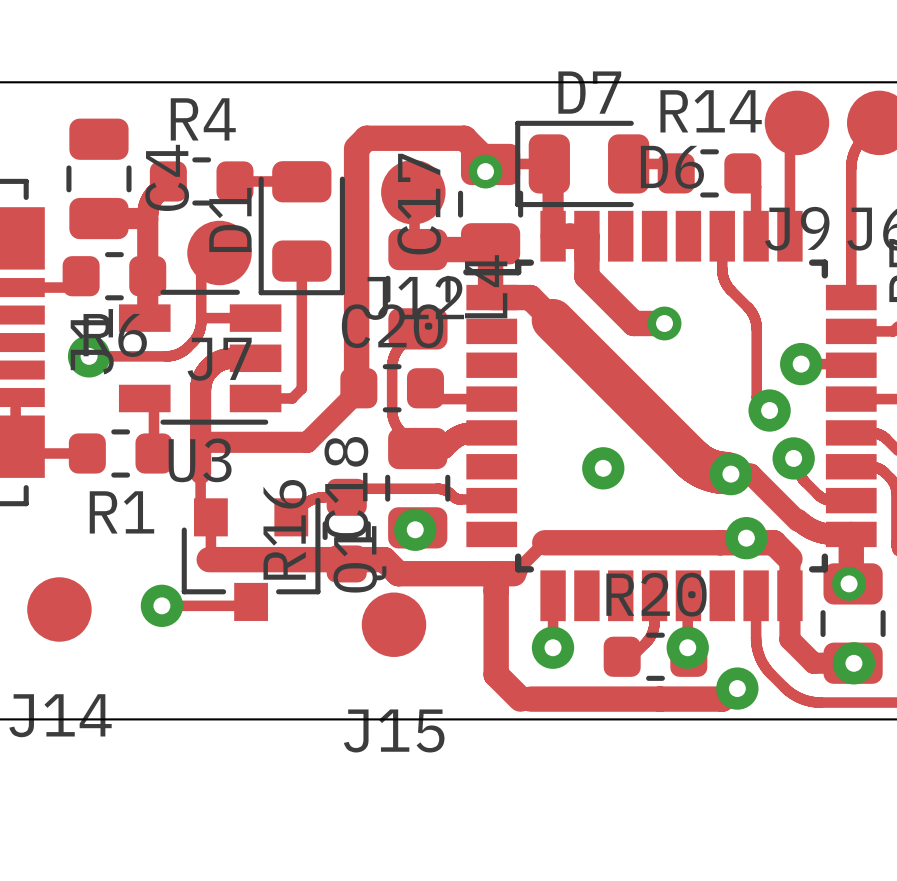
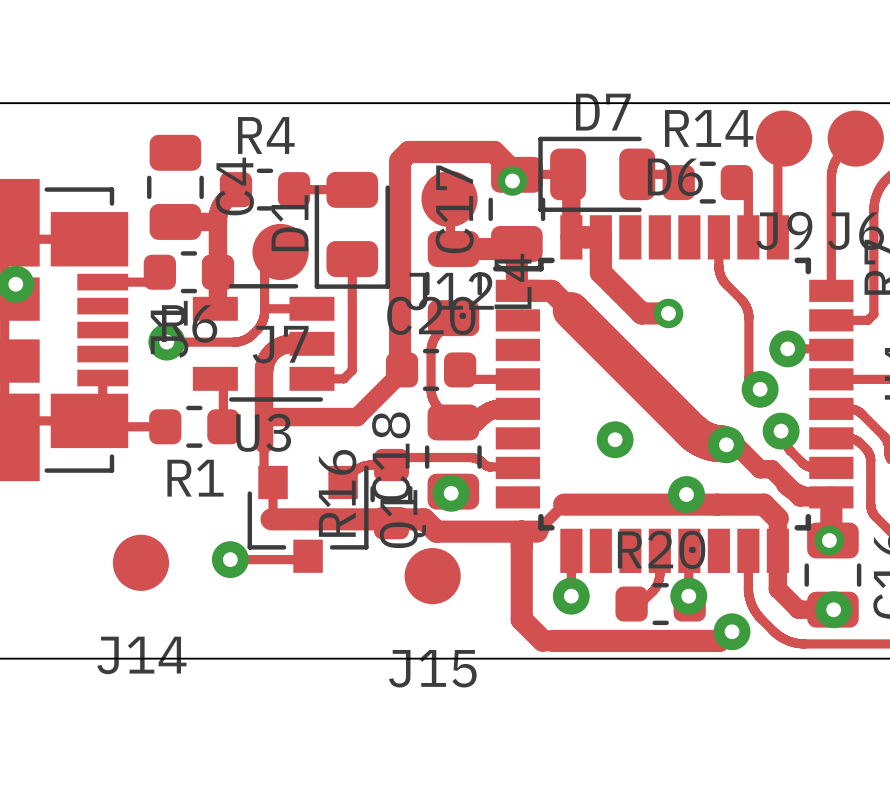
track: (742, 474) (750, 474) (799, 521) -> (735, 444) (760, 469) (771, 469) (799, 497) (816, 497)
via position: (746, 538) -> (686, 494)

